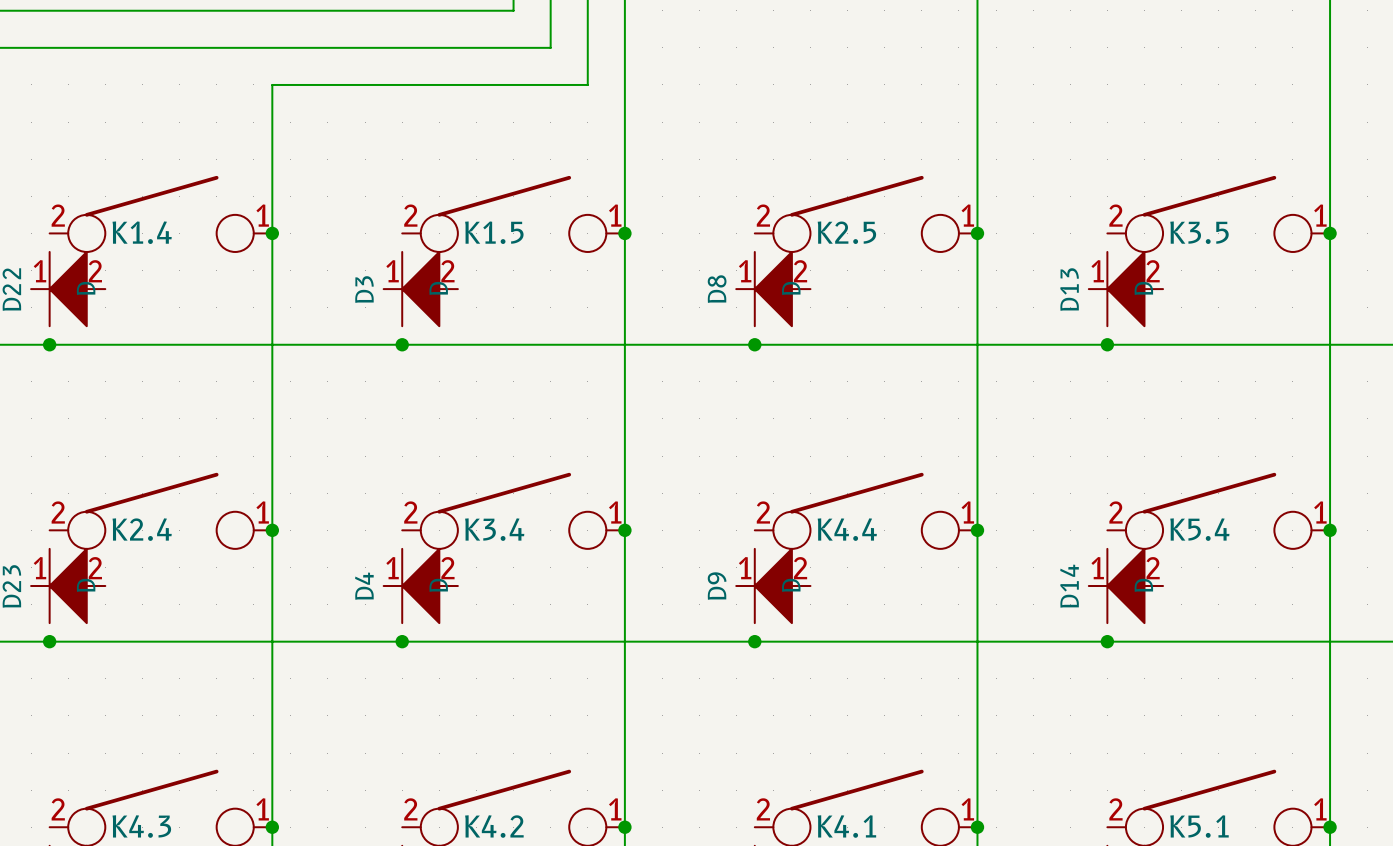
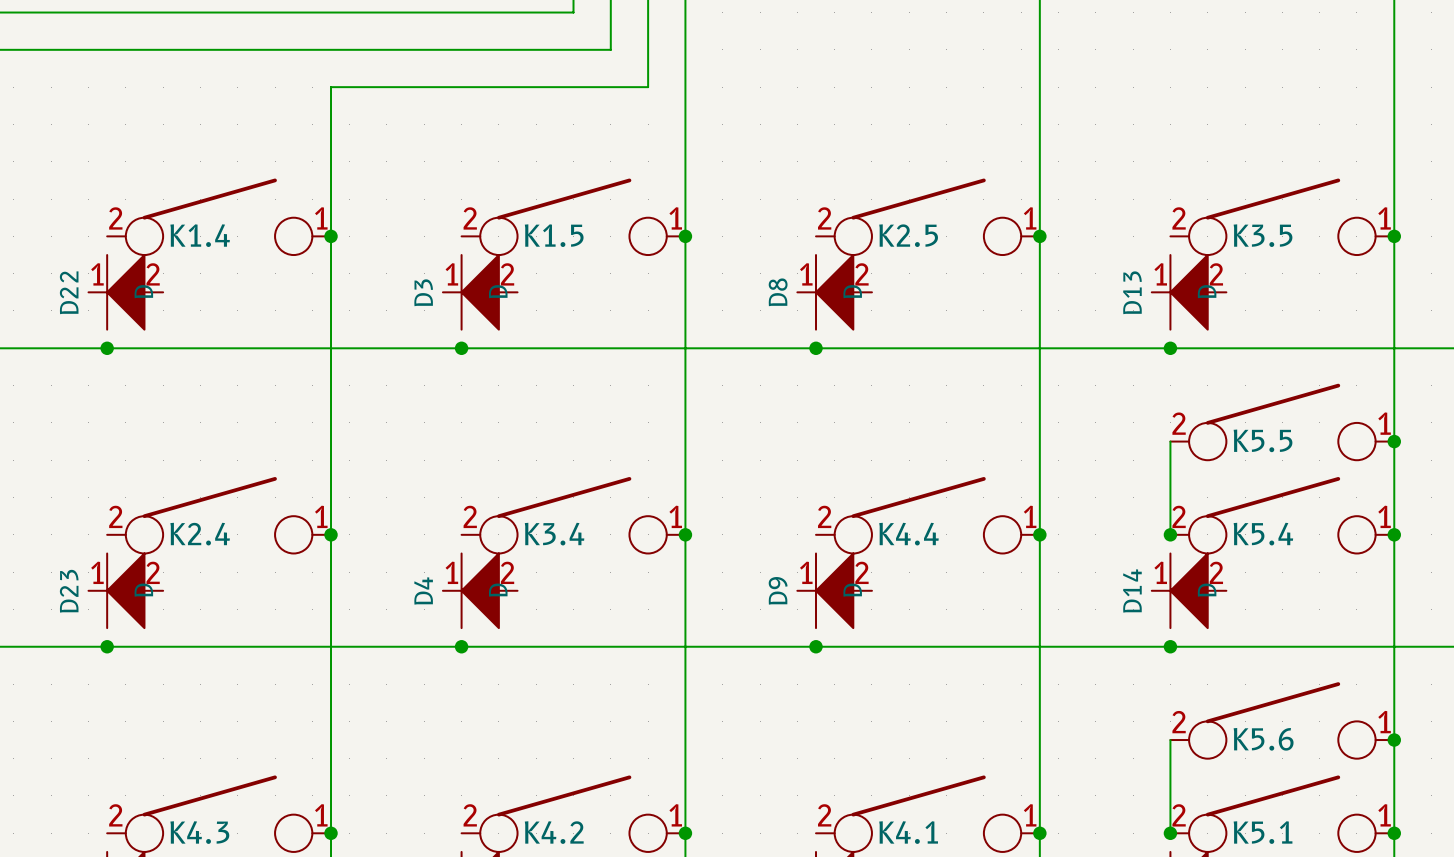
K5.5: none -> (1282, 421)
wire: none -> (1170, 441) (1170, 534)
junction: none -> (1394, 441)
junction: none -> (1170, 534)
K5.6: none -> (1282, 720)
wire: none -> (1170, 740) (1170, 833)
junction: none -> (1394, 740)
junction: none -> (1170, 833)

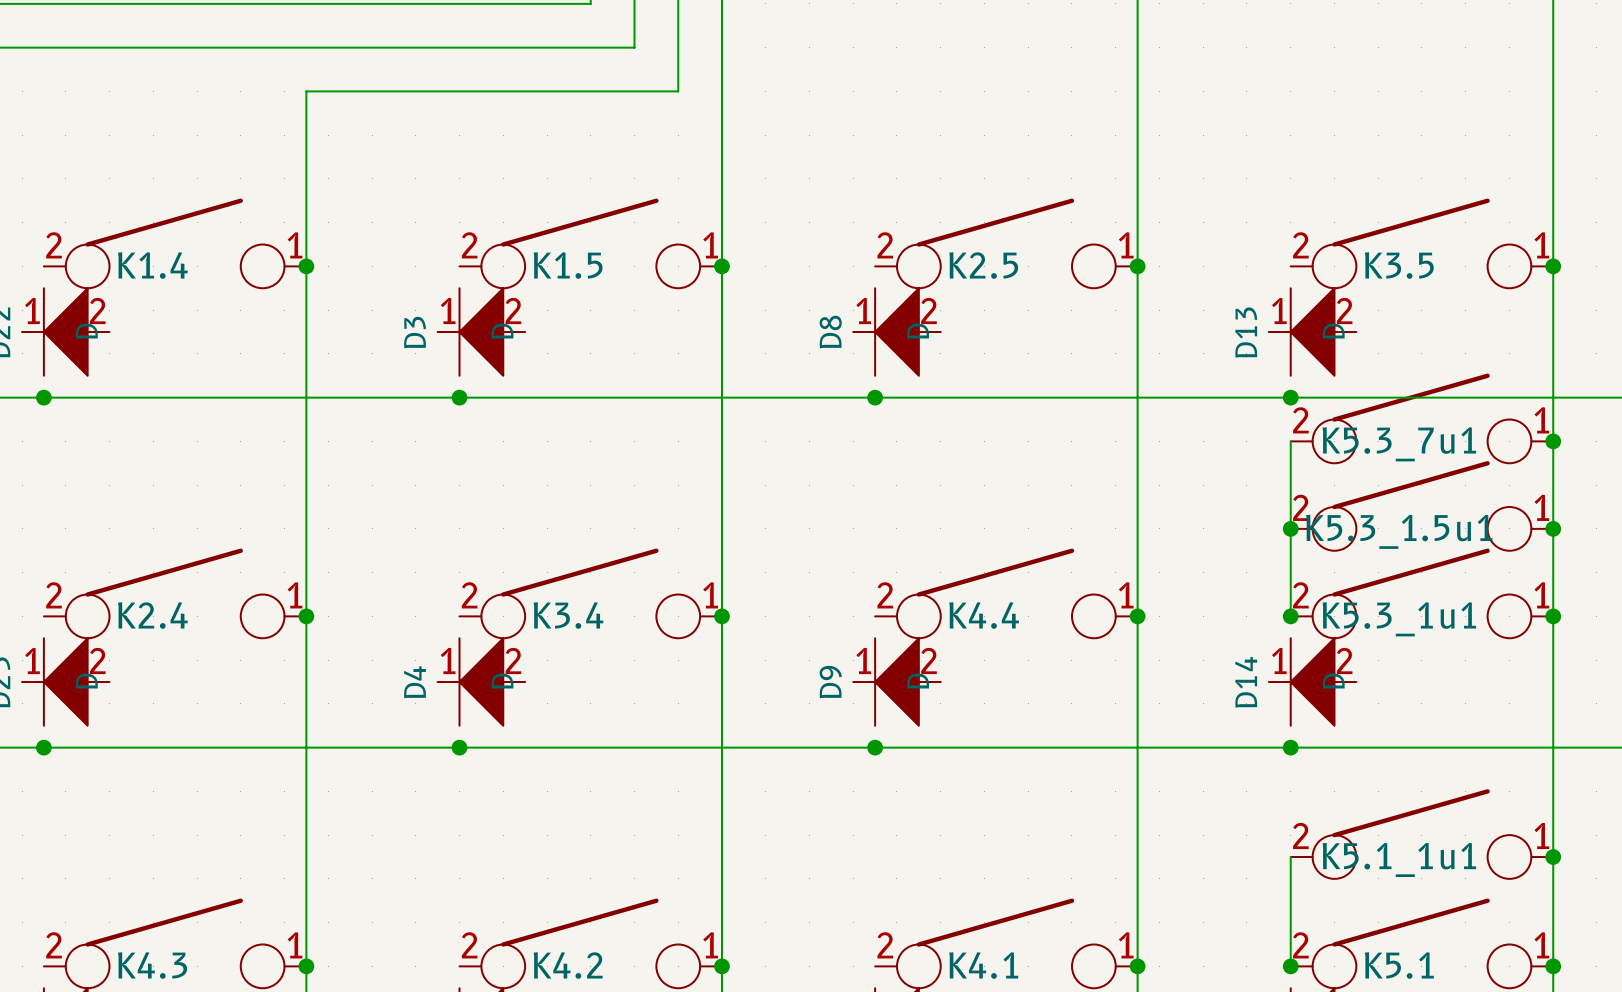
K5.3_7u1: none -> (1421, 418)
wire: none -> (1290, 441) (1290, 507)
junction: none -> (1553, 441)
K5.5: (1282, 421) -> none
K5.3_1.5u1: none -> (1421, 505)
junction position: (1394, 441) -> (1553, 528)
junction: none -> (1290, 528)
K5.4 name: K5.4 (1263, 534) -> K5.3_1u1 (1399, 619)
K5.6 name: K5.6 (1263, 739) -> K5.1_1u1 (1399, 859)

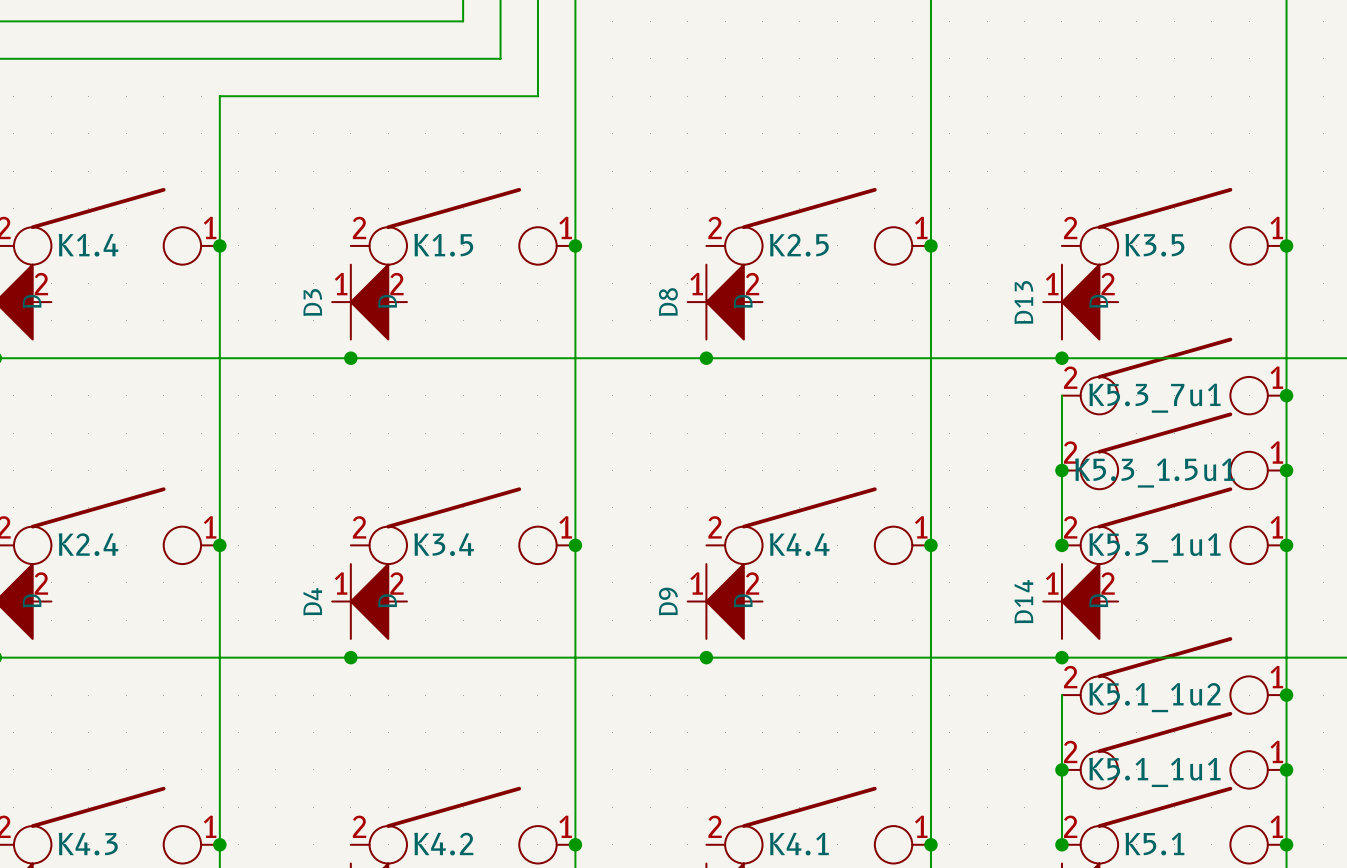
K5.1_1u2: none -> (1174, 675)
wire: none -> (1061, 695) (1061, 751)
junction: none -> (1286, 695)
K5.1_1u1 position: (1421, 834) -> (1174, 750)
junction position: (1553, 857) -> (1286, 769)
junction: none -> (1061, 769)

